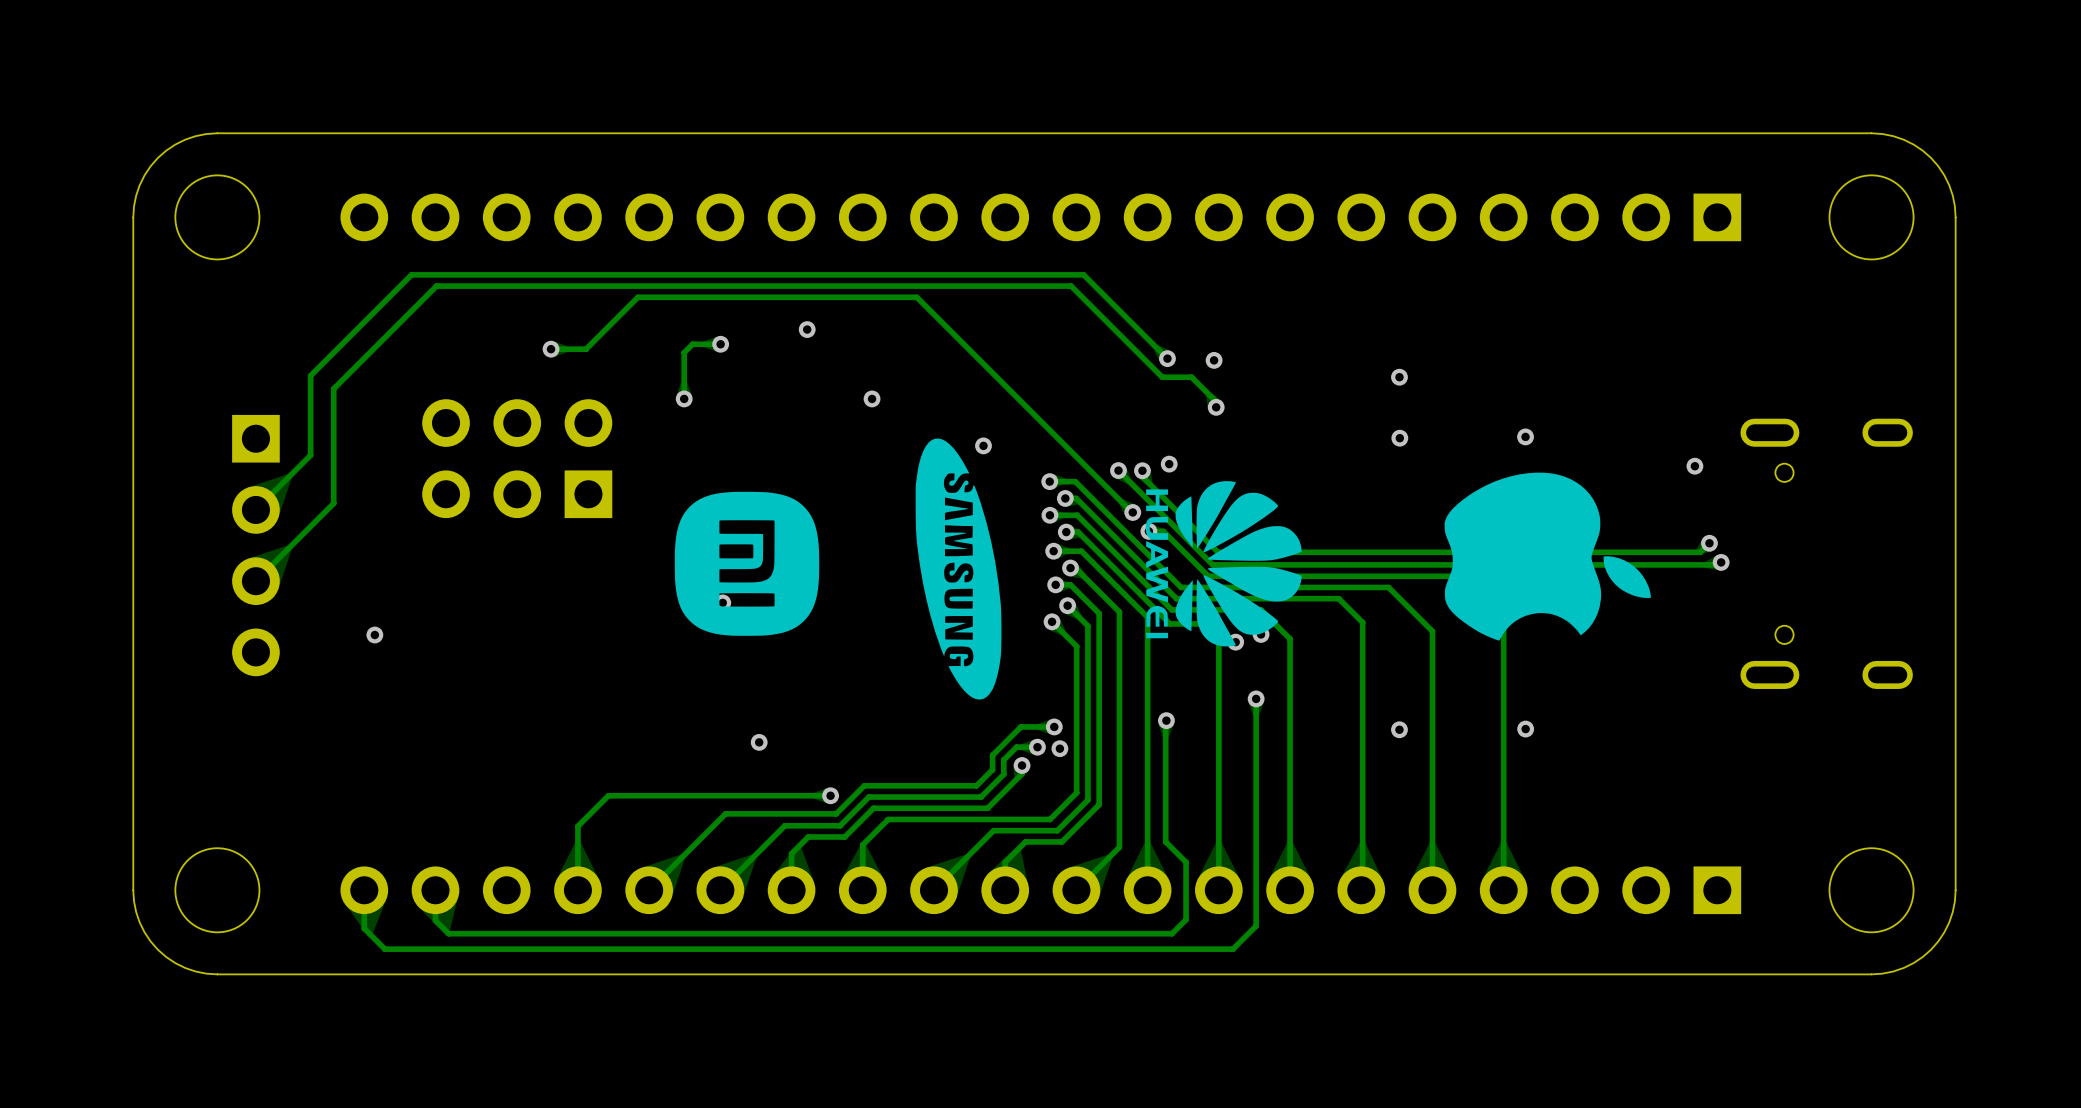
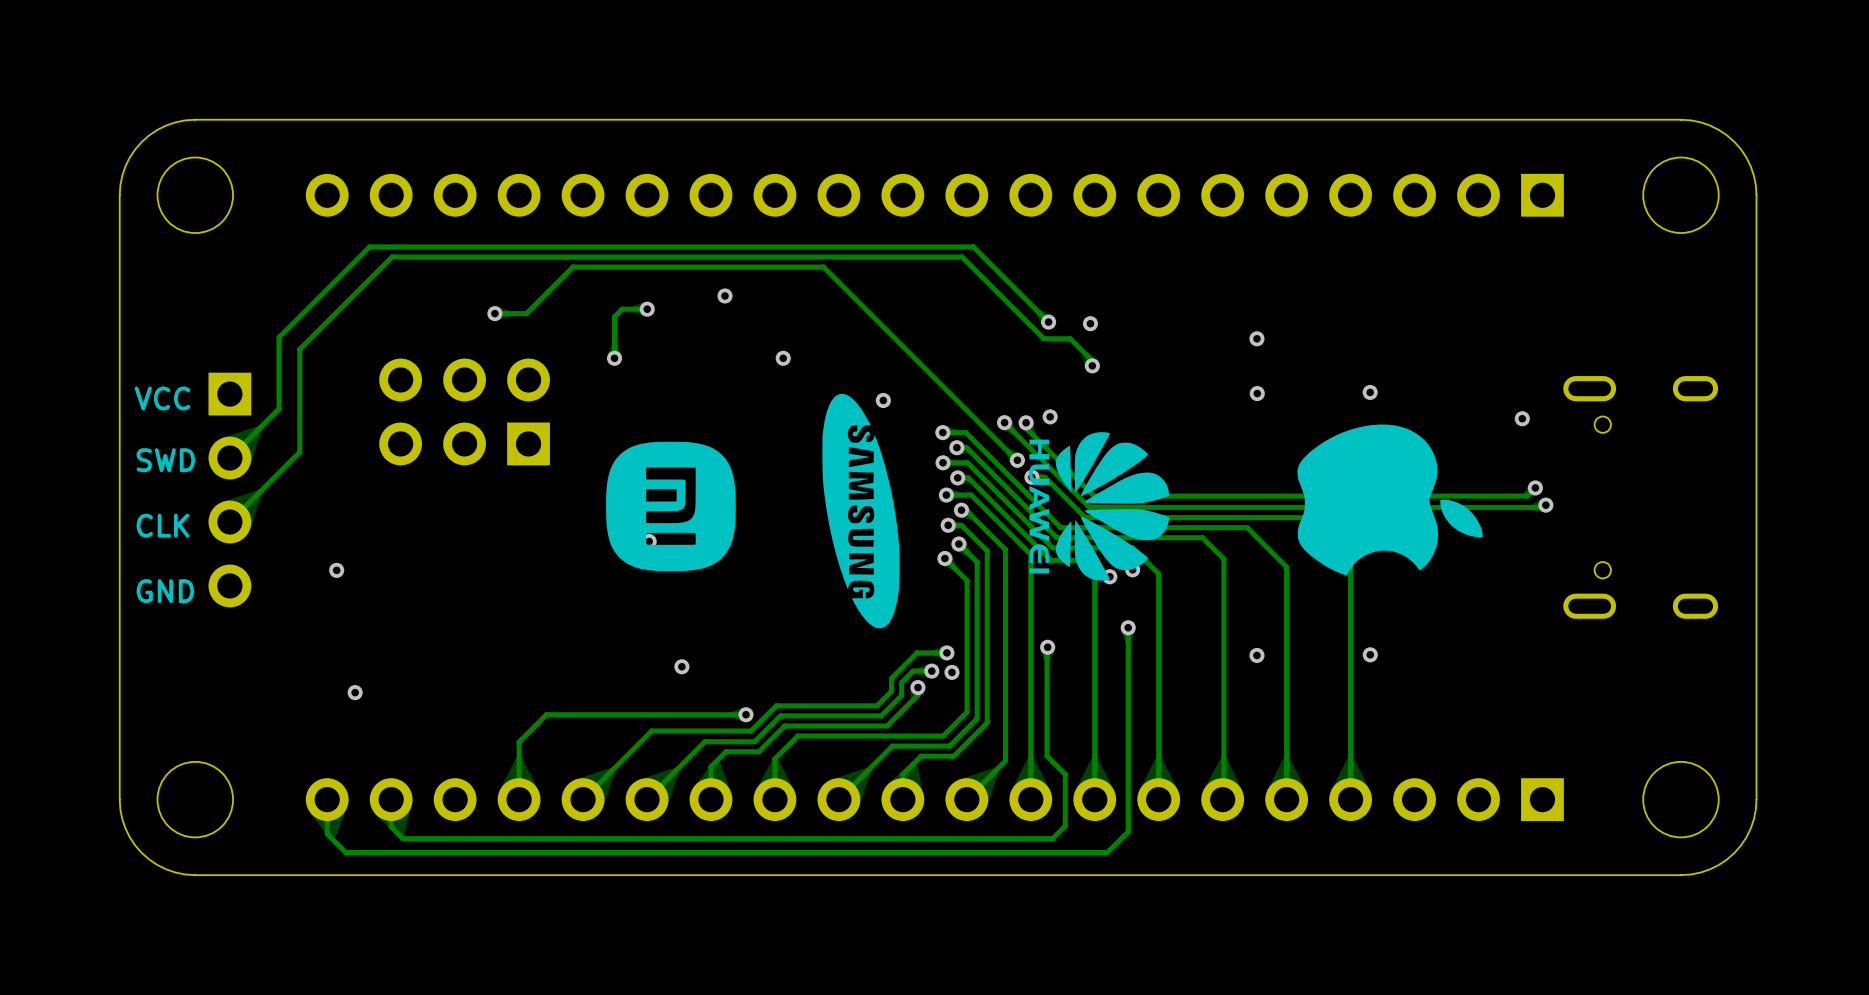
text: none -> VCC (162, 398)
text: none -> SWD (165, 460)
text: none -> CLK (162, 525)
text: none -> GND (165, 591)
via: none -> (355, 692)

